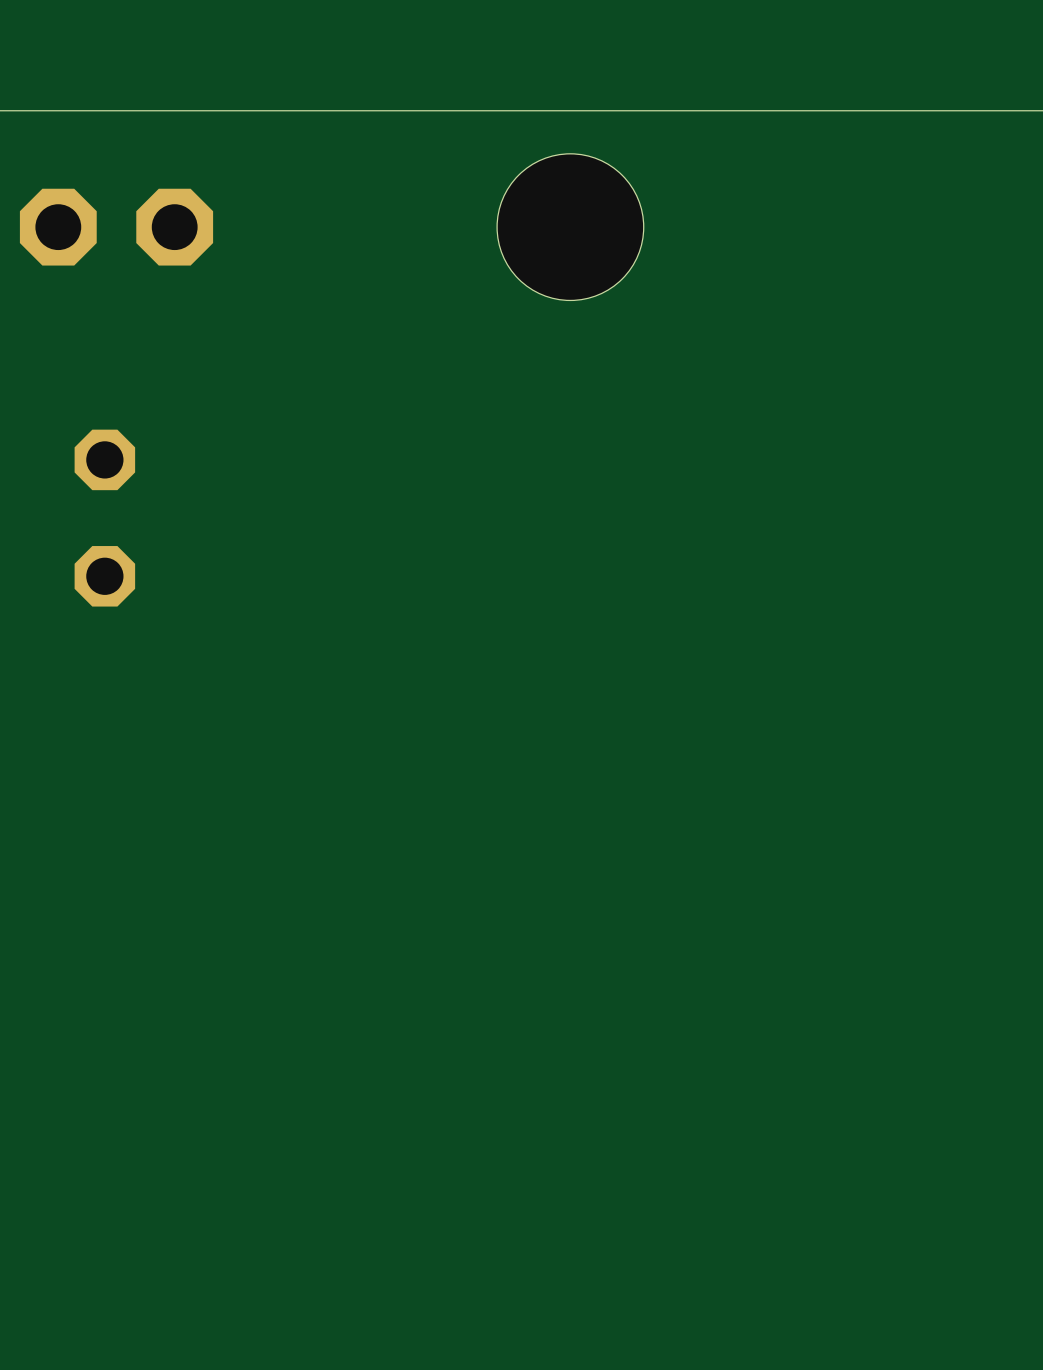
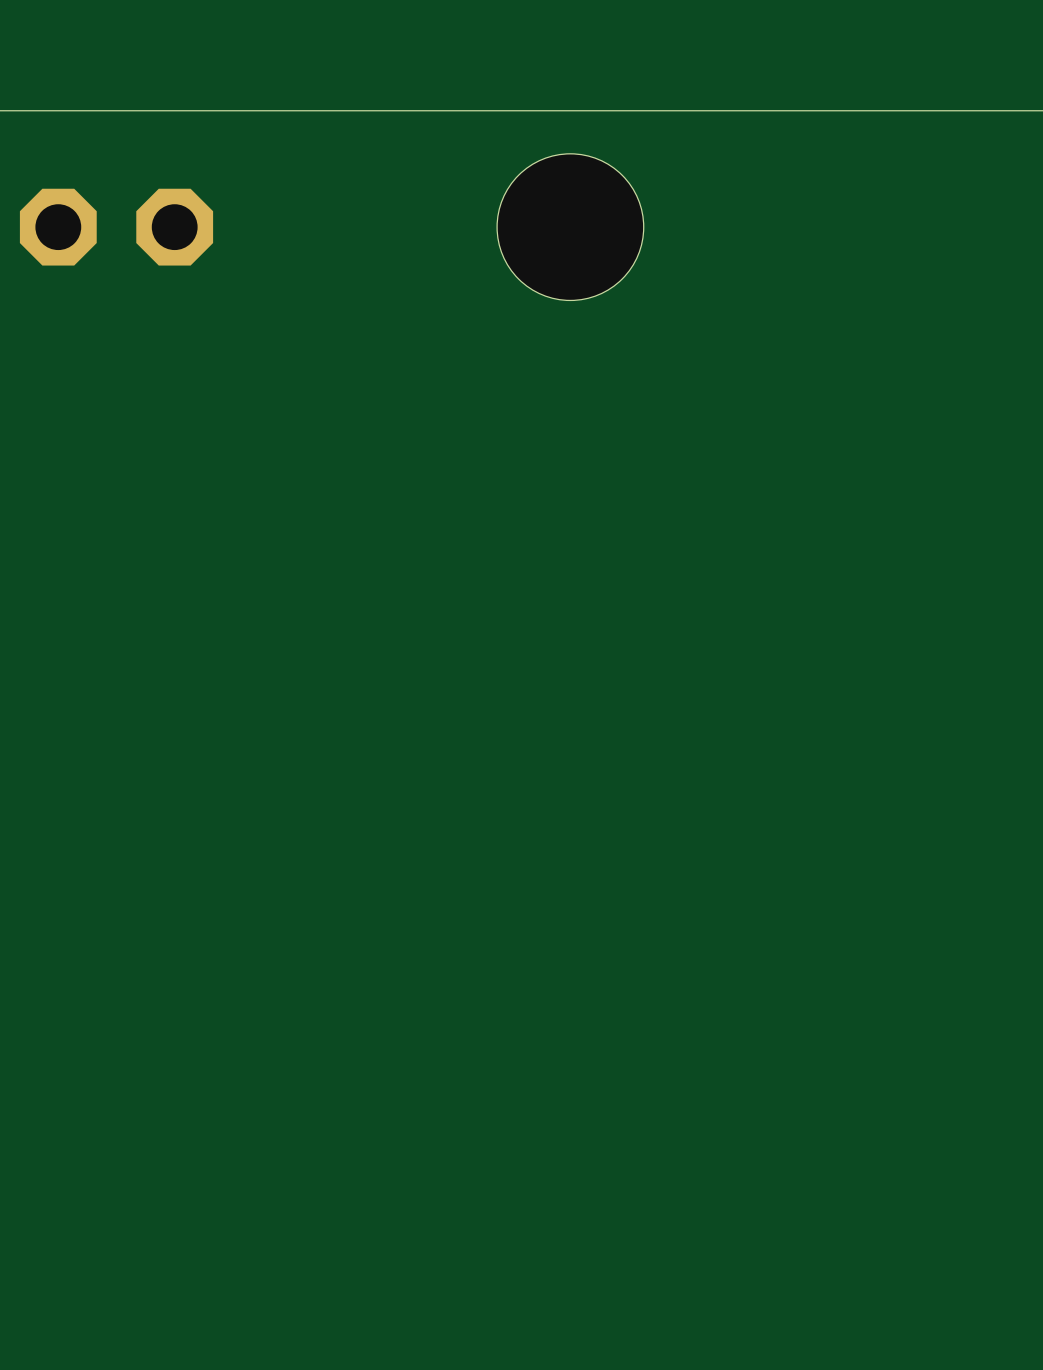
part: (104, 518) -> none

